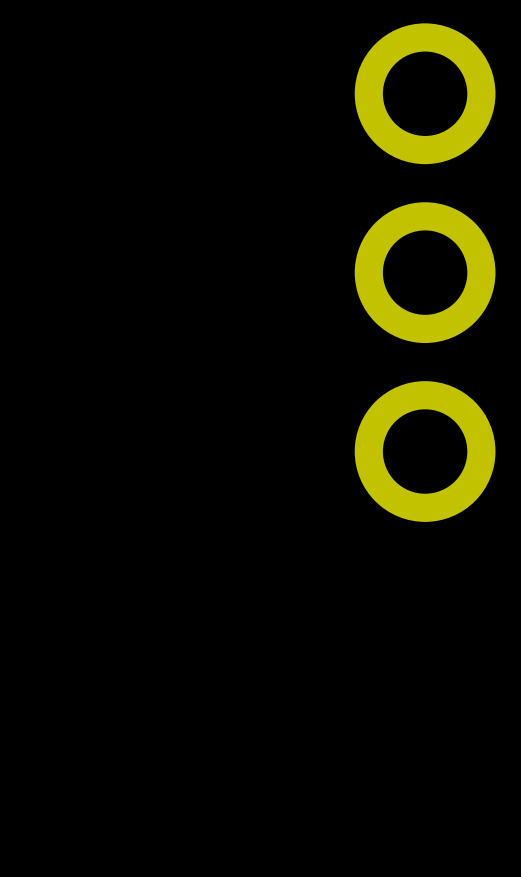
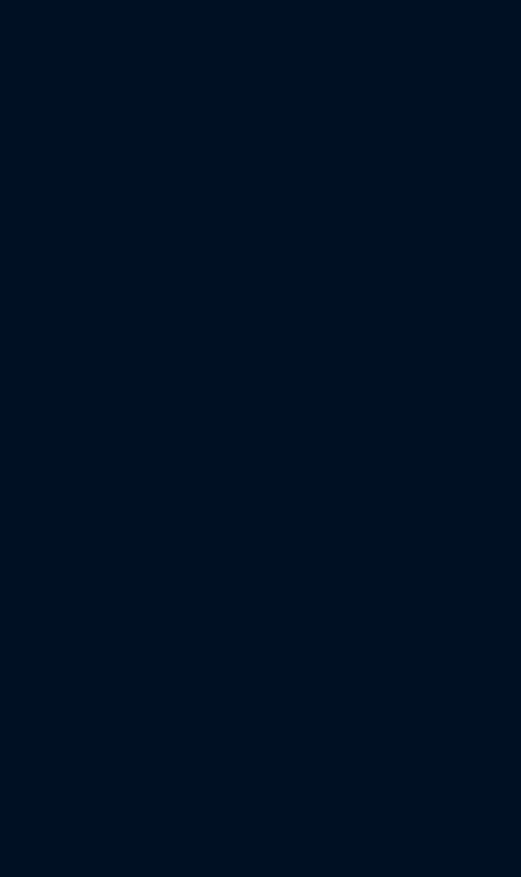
part: (425, 272) -> none

